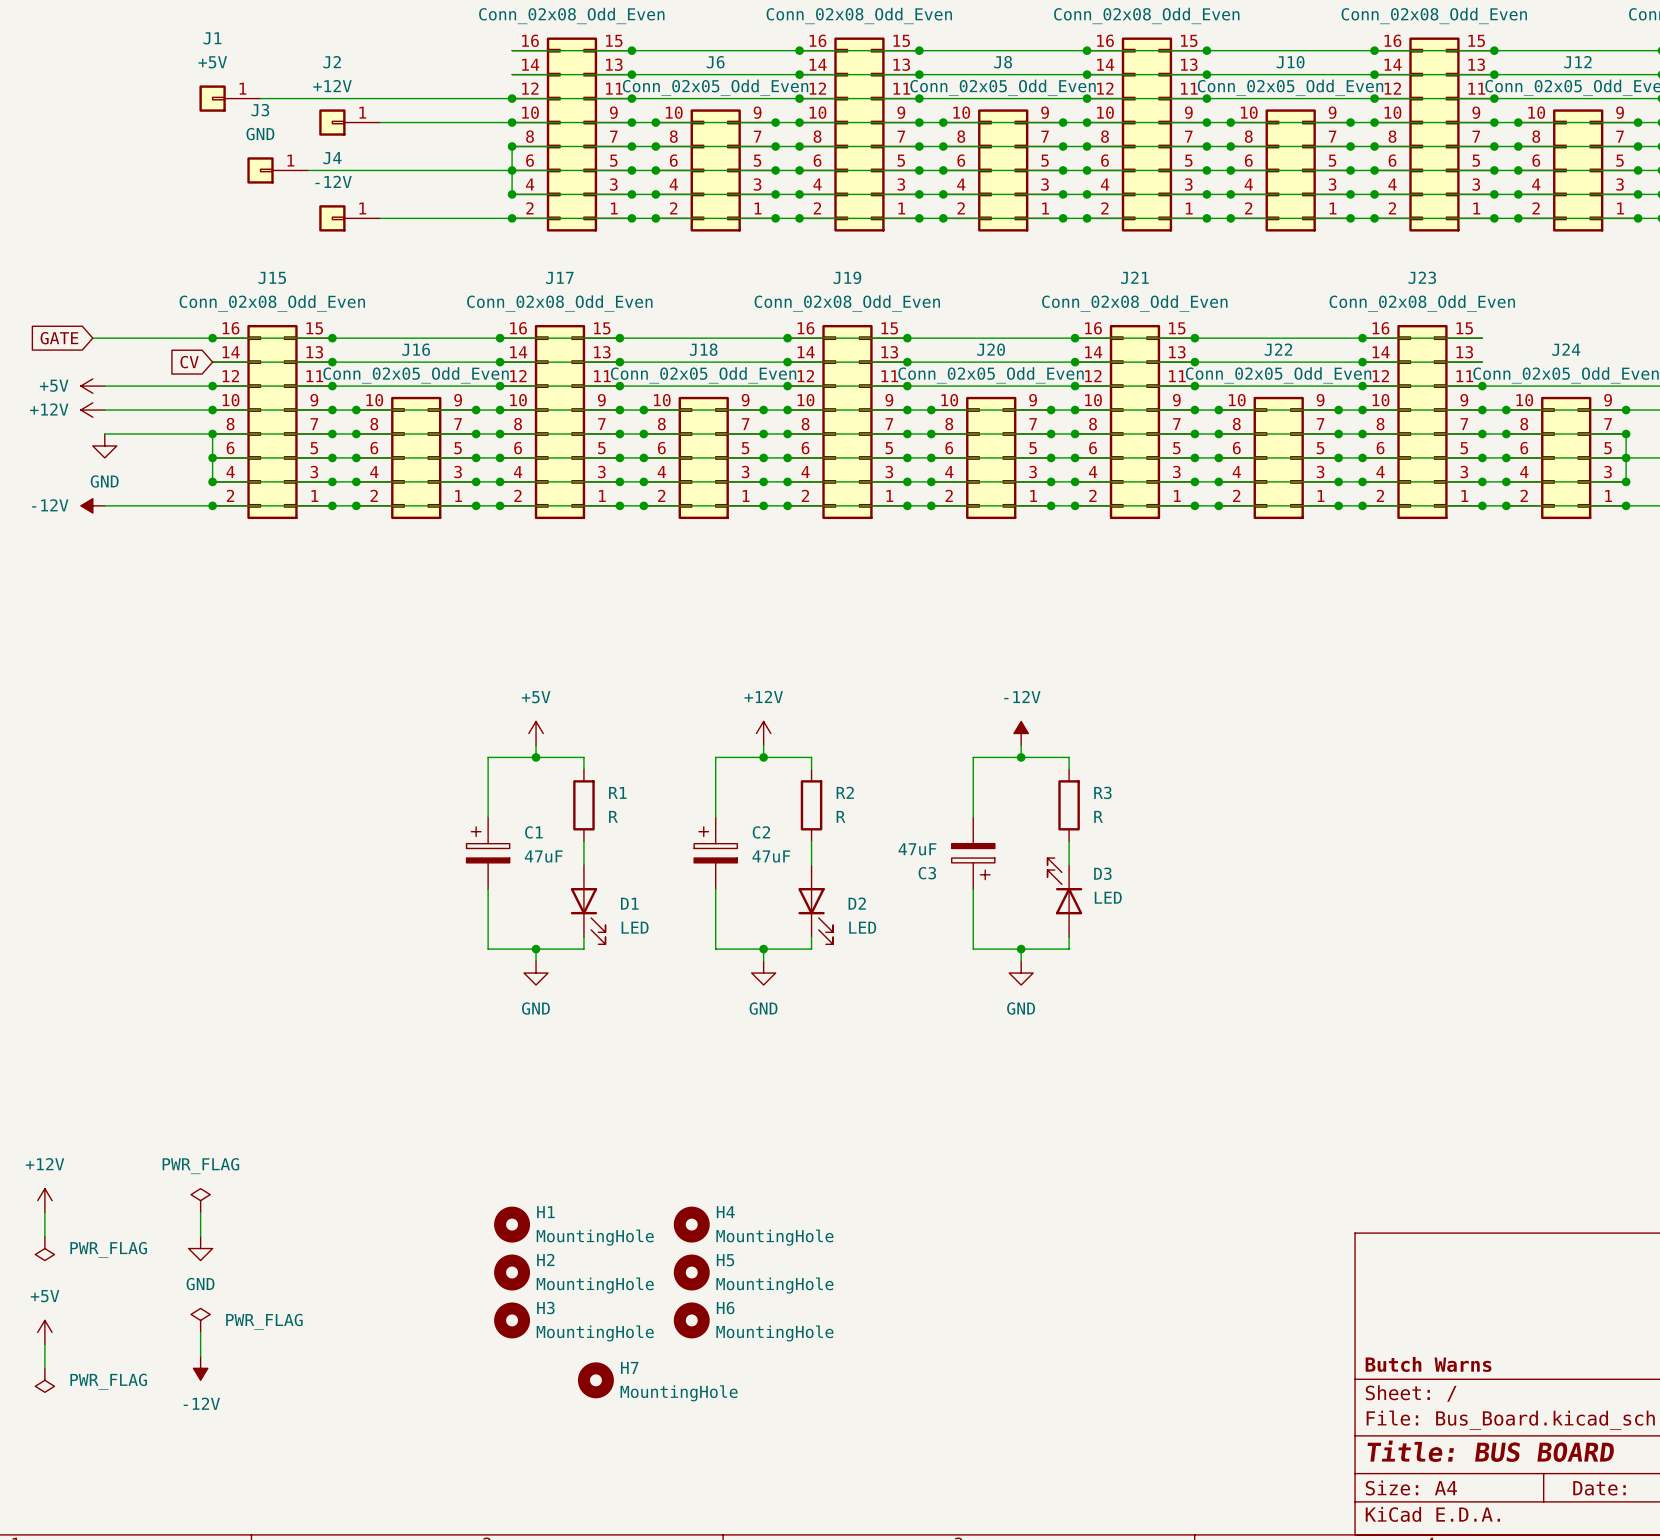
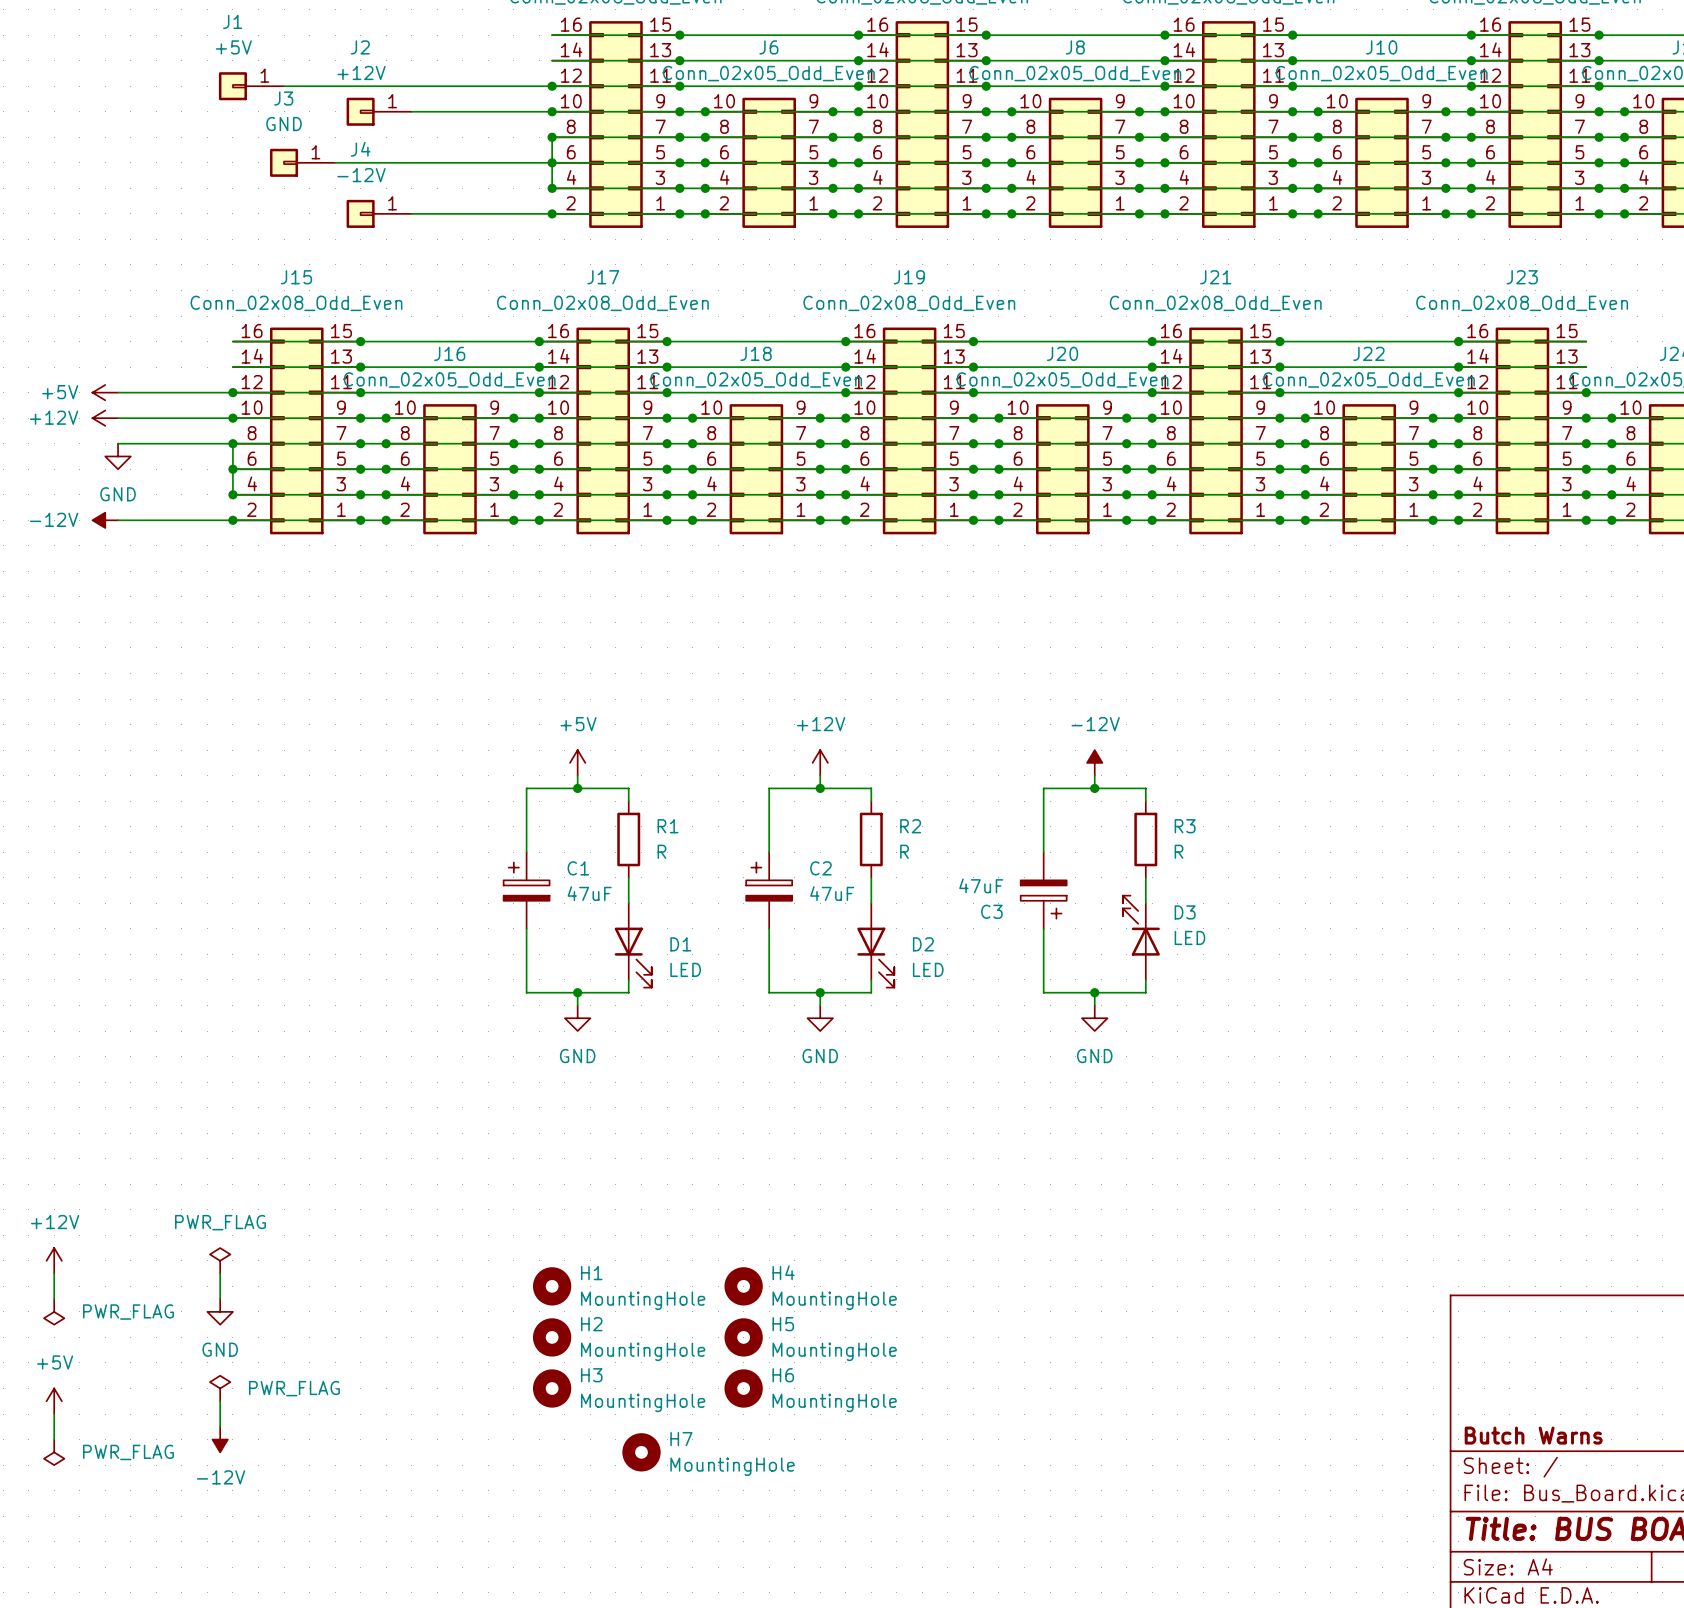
global label: GATE (59, 338) -> none
wire: (92, 338) (212, 338) -> none
junction: (212, 338) -> none
global label: CV (189, 362) -> none

